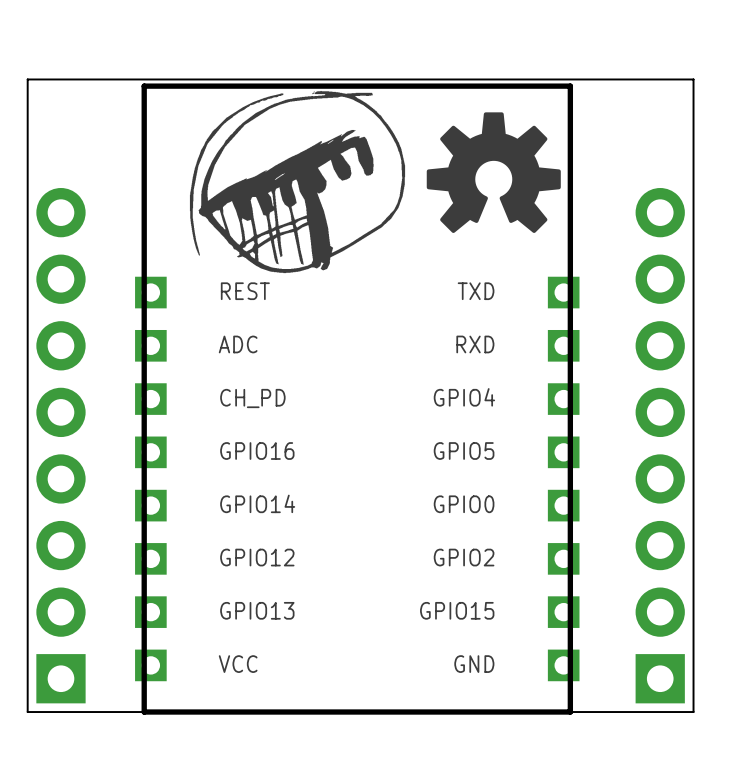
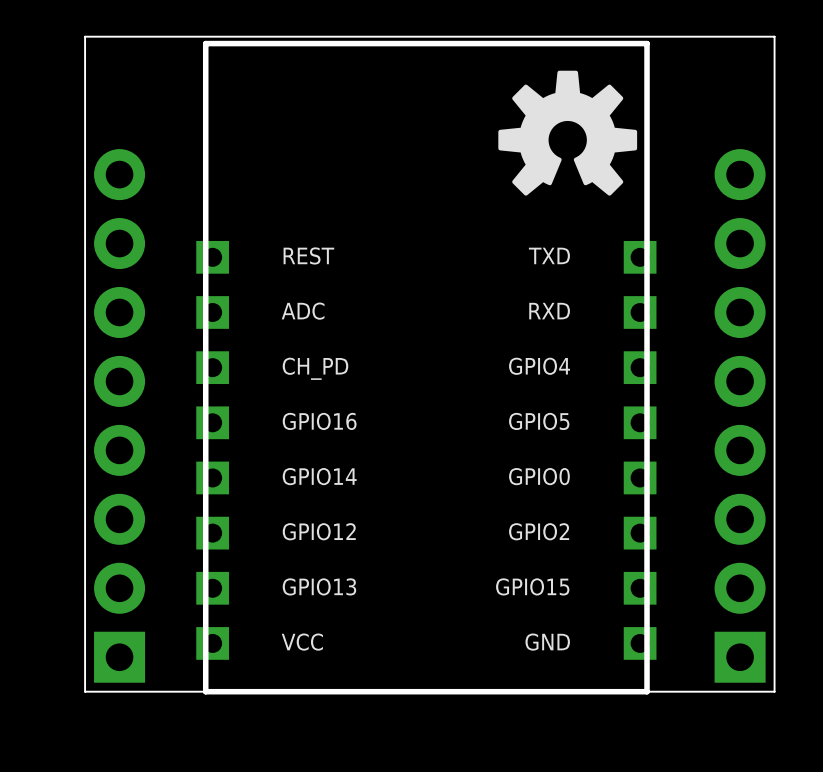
drawing: [189, 90, 406, 274] -> none

